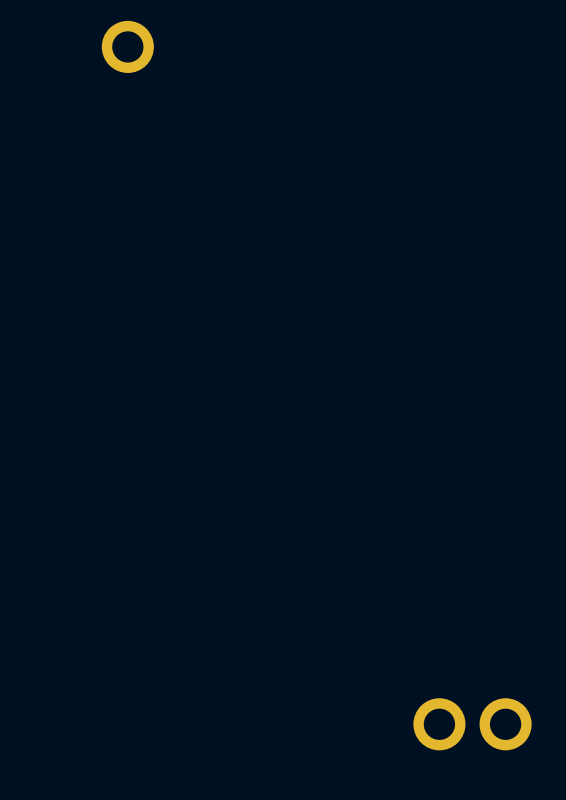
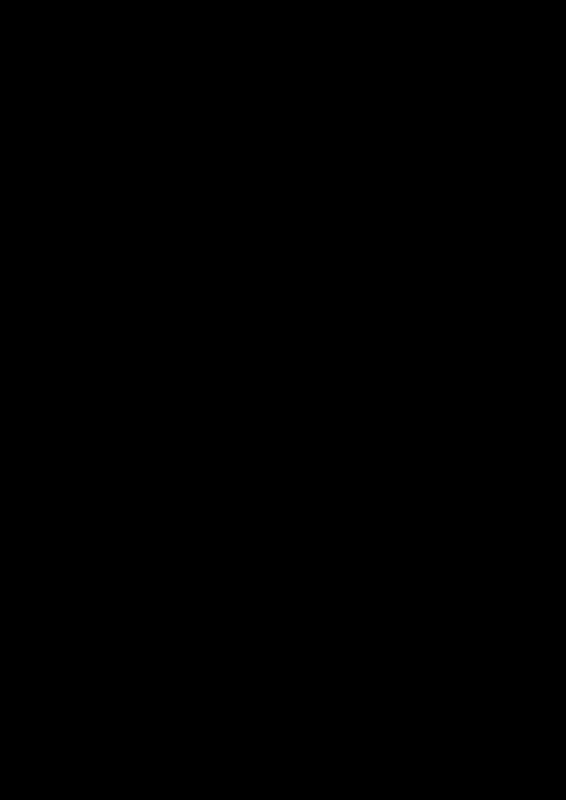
part: (127, 46) -> none
part: (472, 724) -> none

